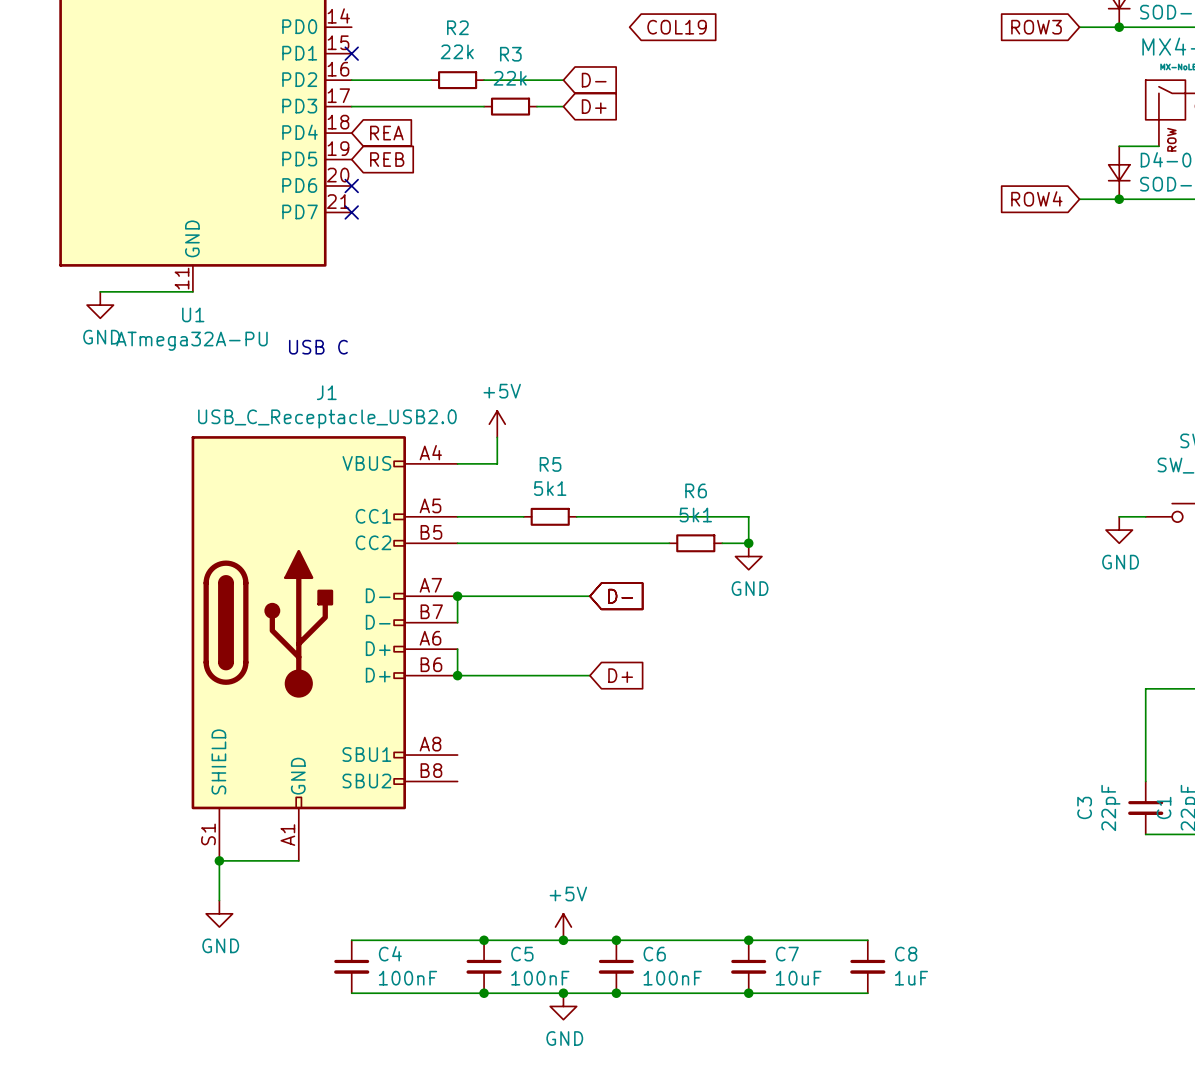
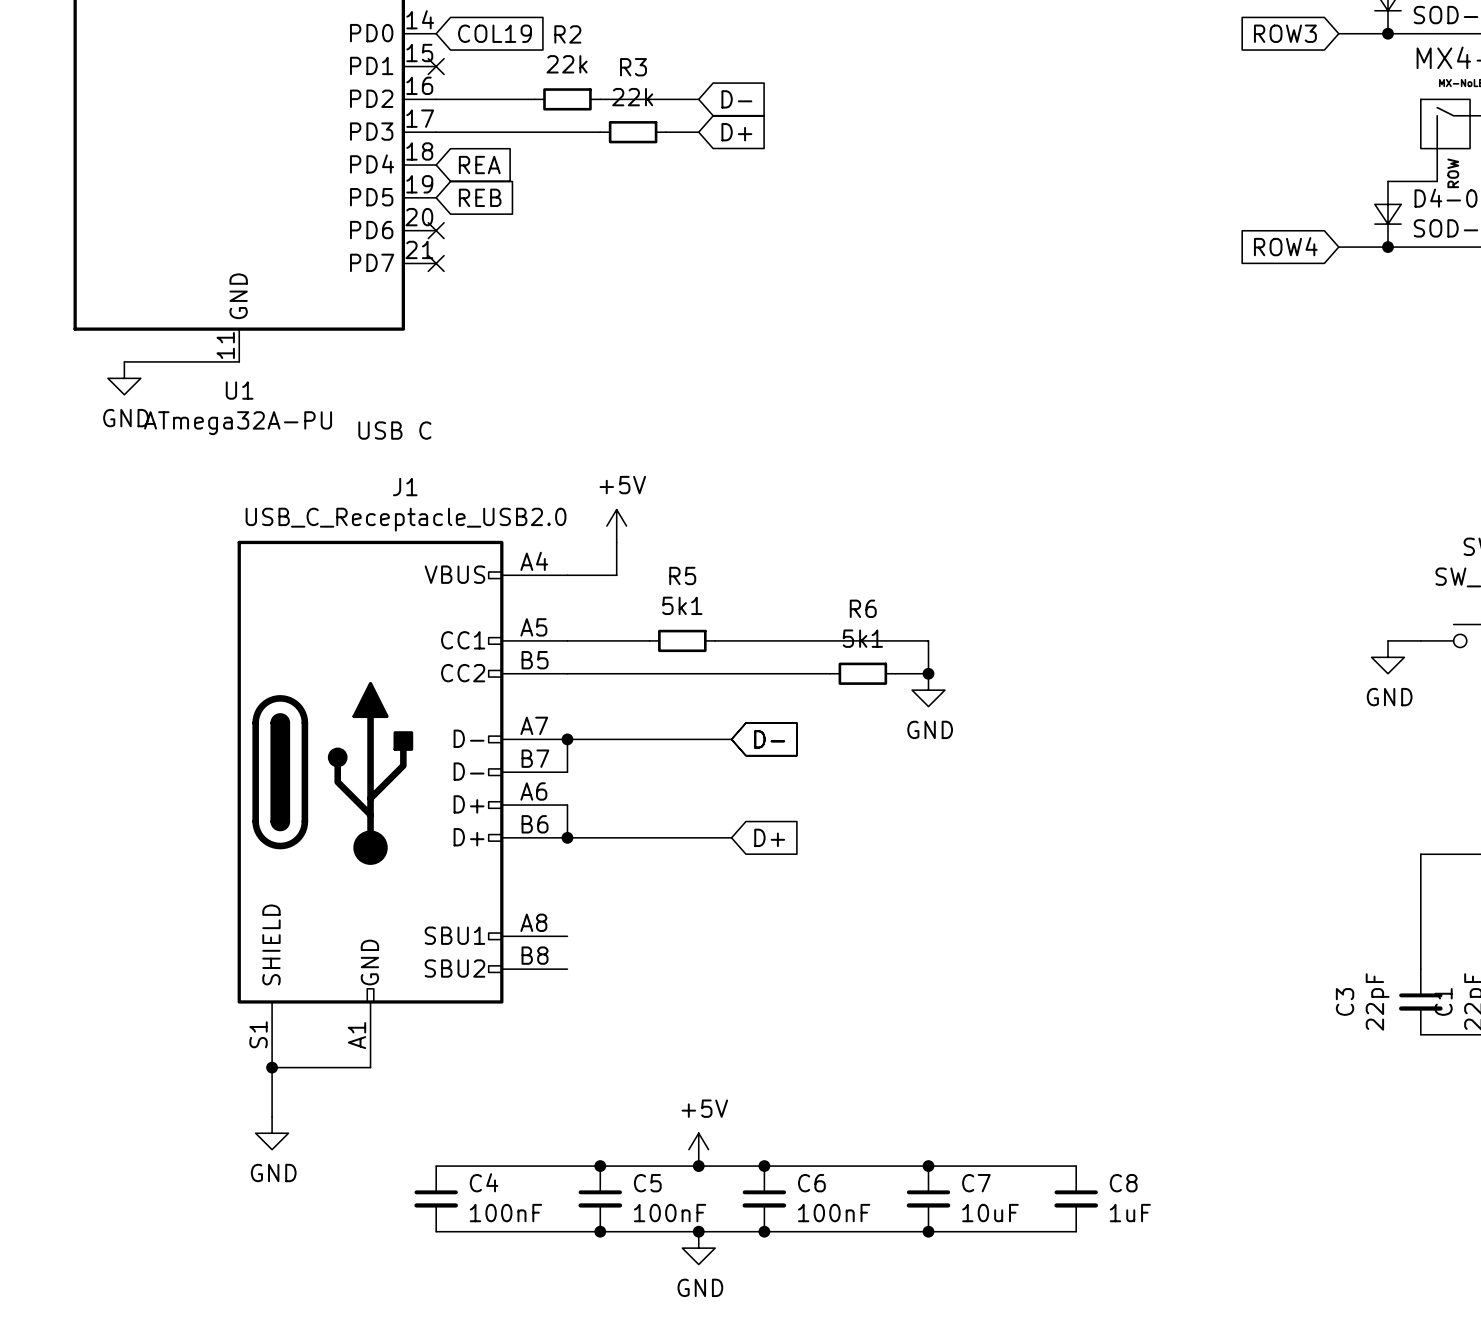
global label: none -> COL19 (495, 33)
global label: COL19 (677, 27) -> none

